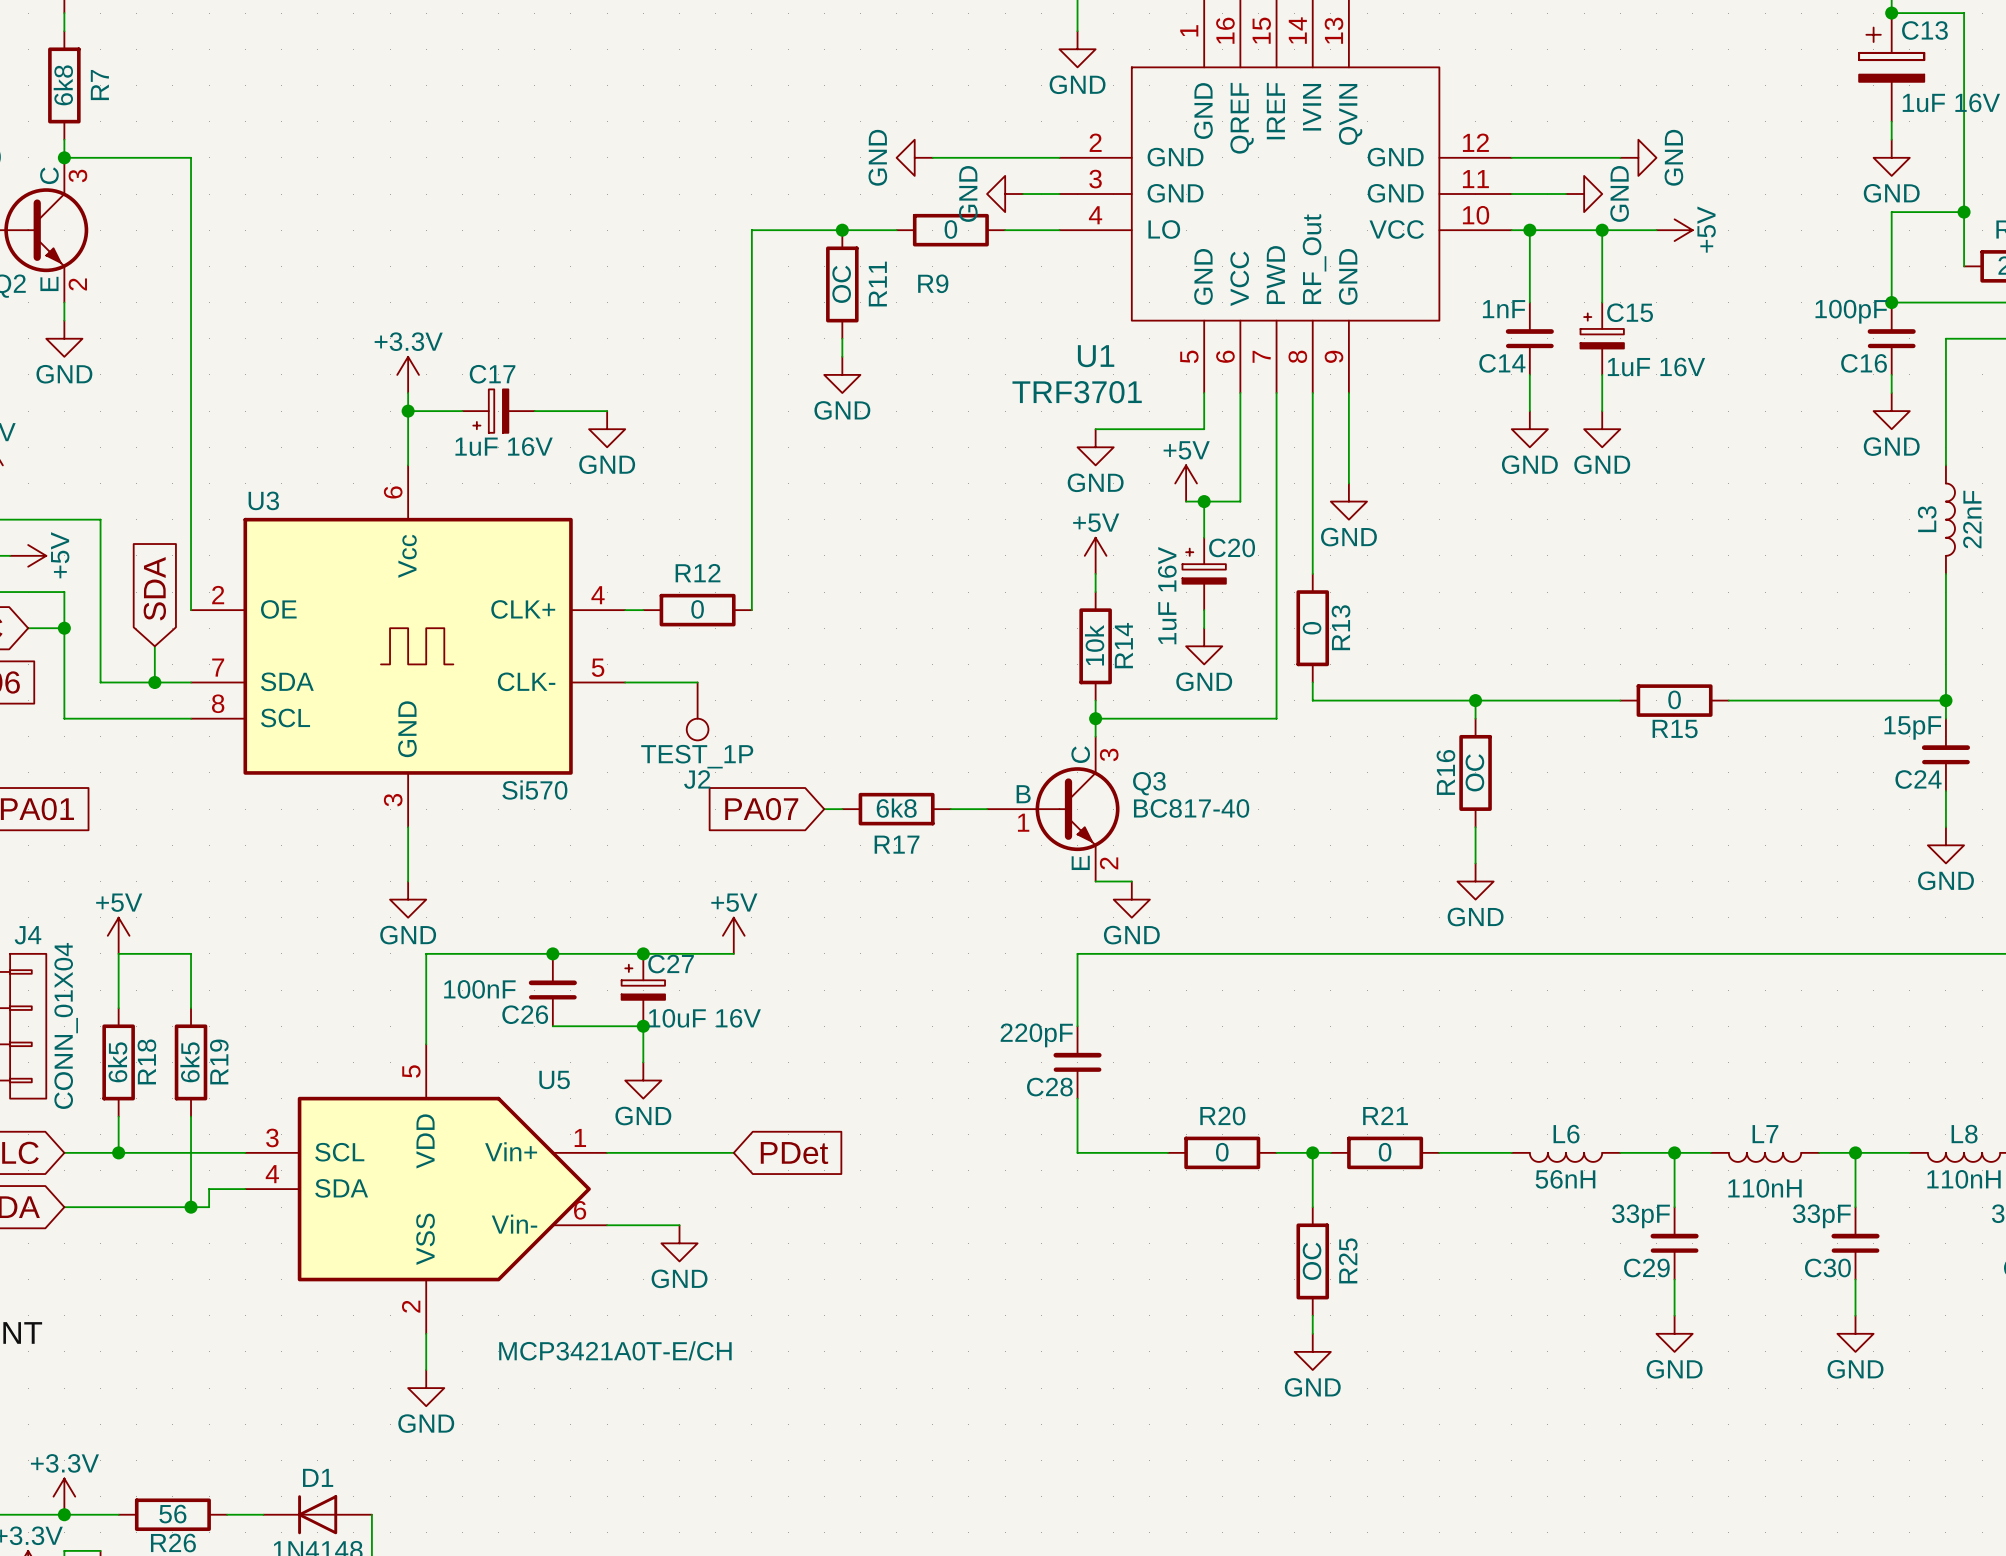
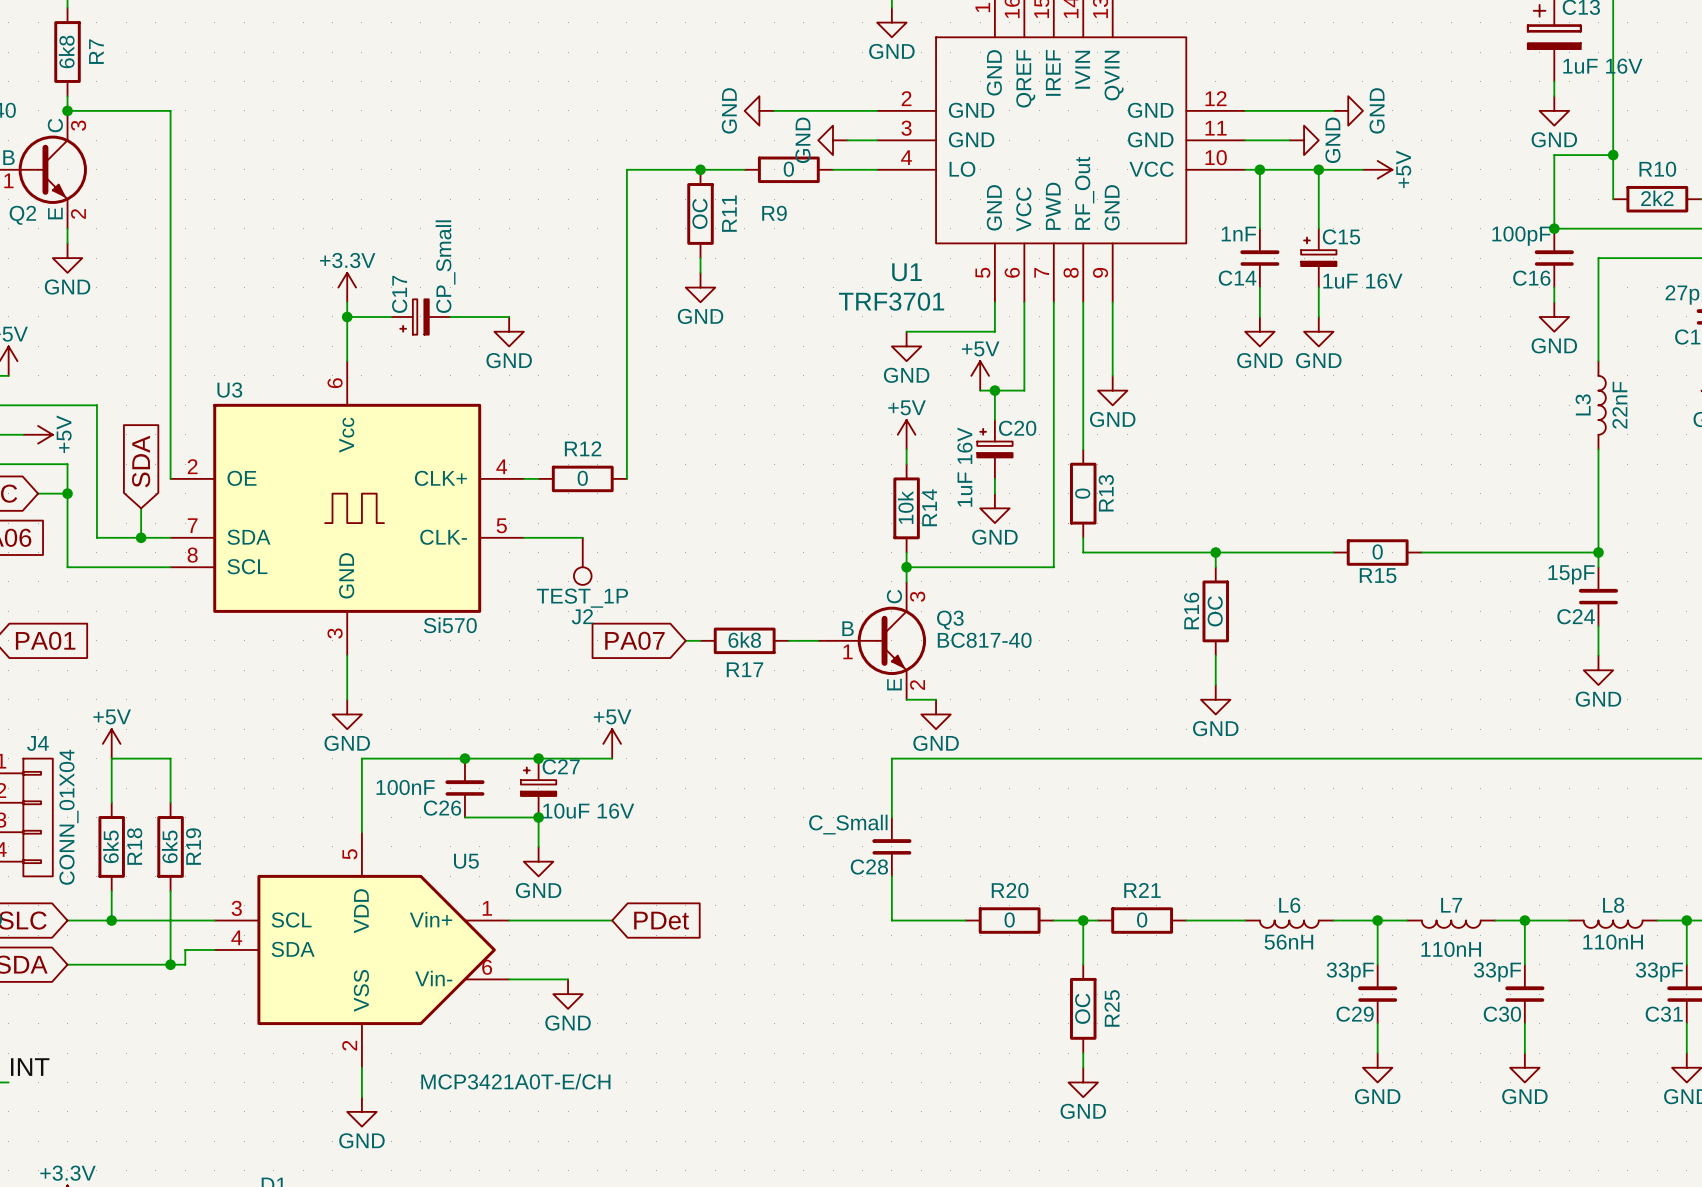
C17 name rotation: 0° (492, 374) -> 90° counterclockwise (399, 294)
C17 value: 1uF 16V (504, 446) -> CP_Small (445, 266)
C28 value: 220pF (1036, 1035) -> C_Small (848, 824)

